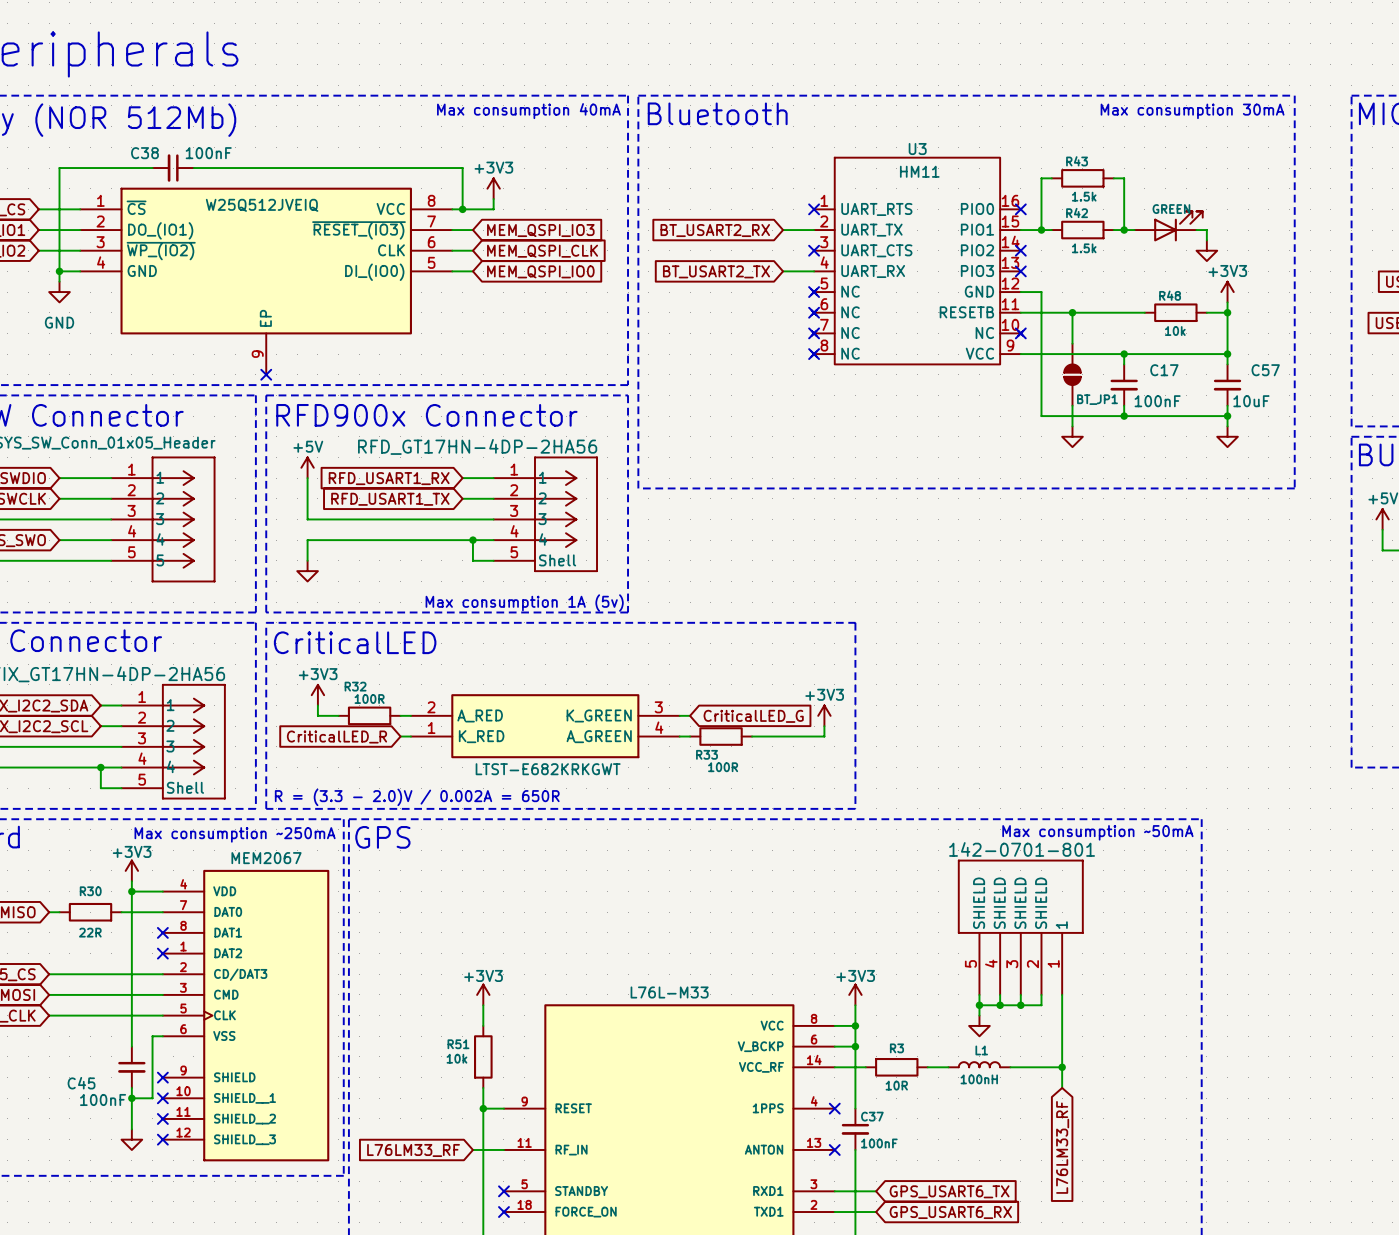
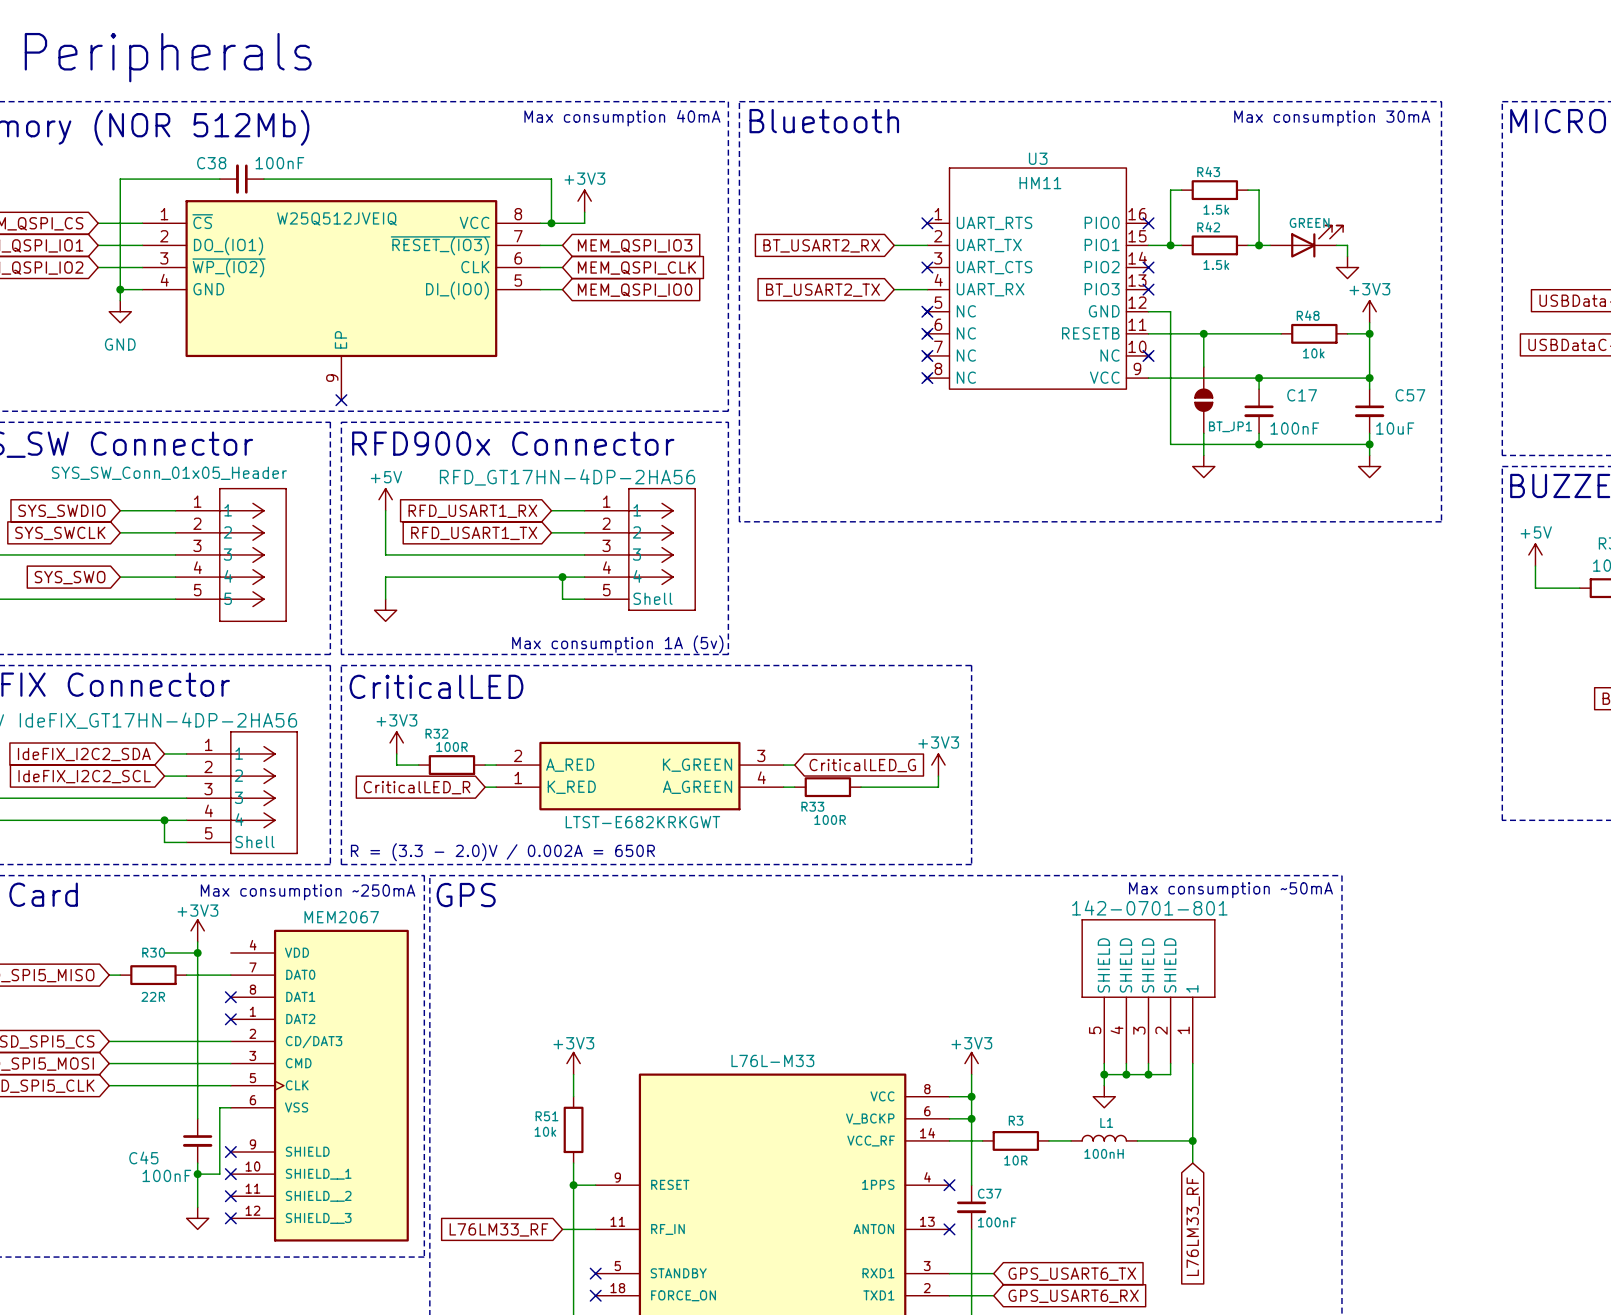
wire: (131, 891) (162, 891) -> (197, 952) (164, 952)

